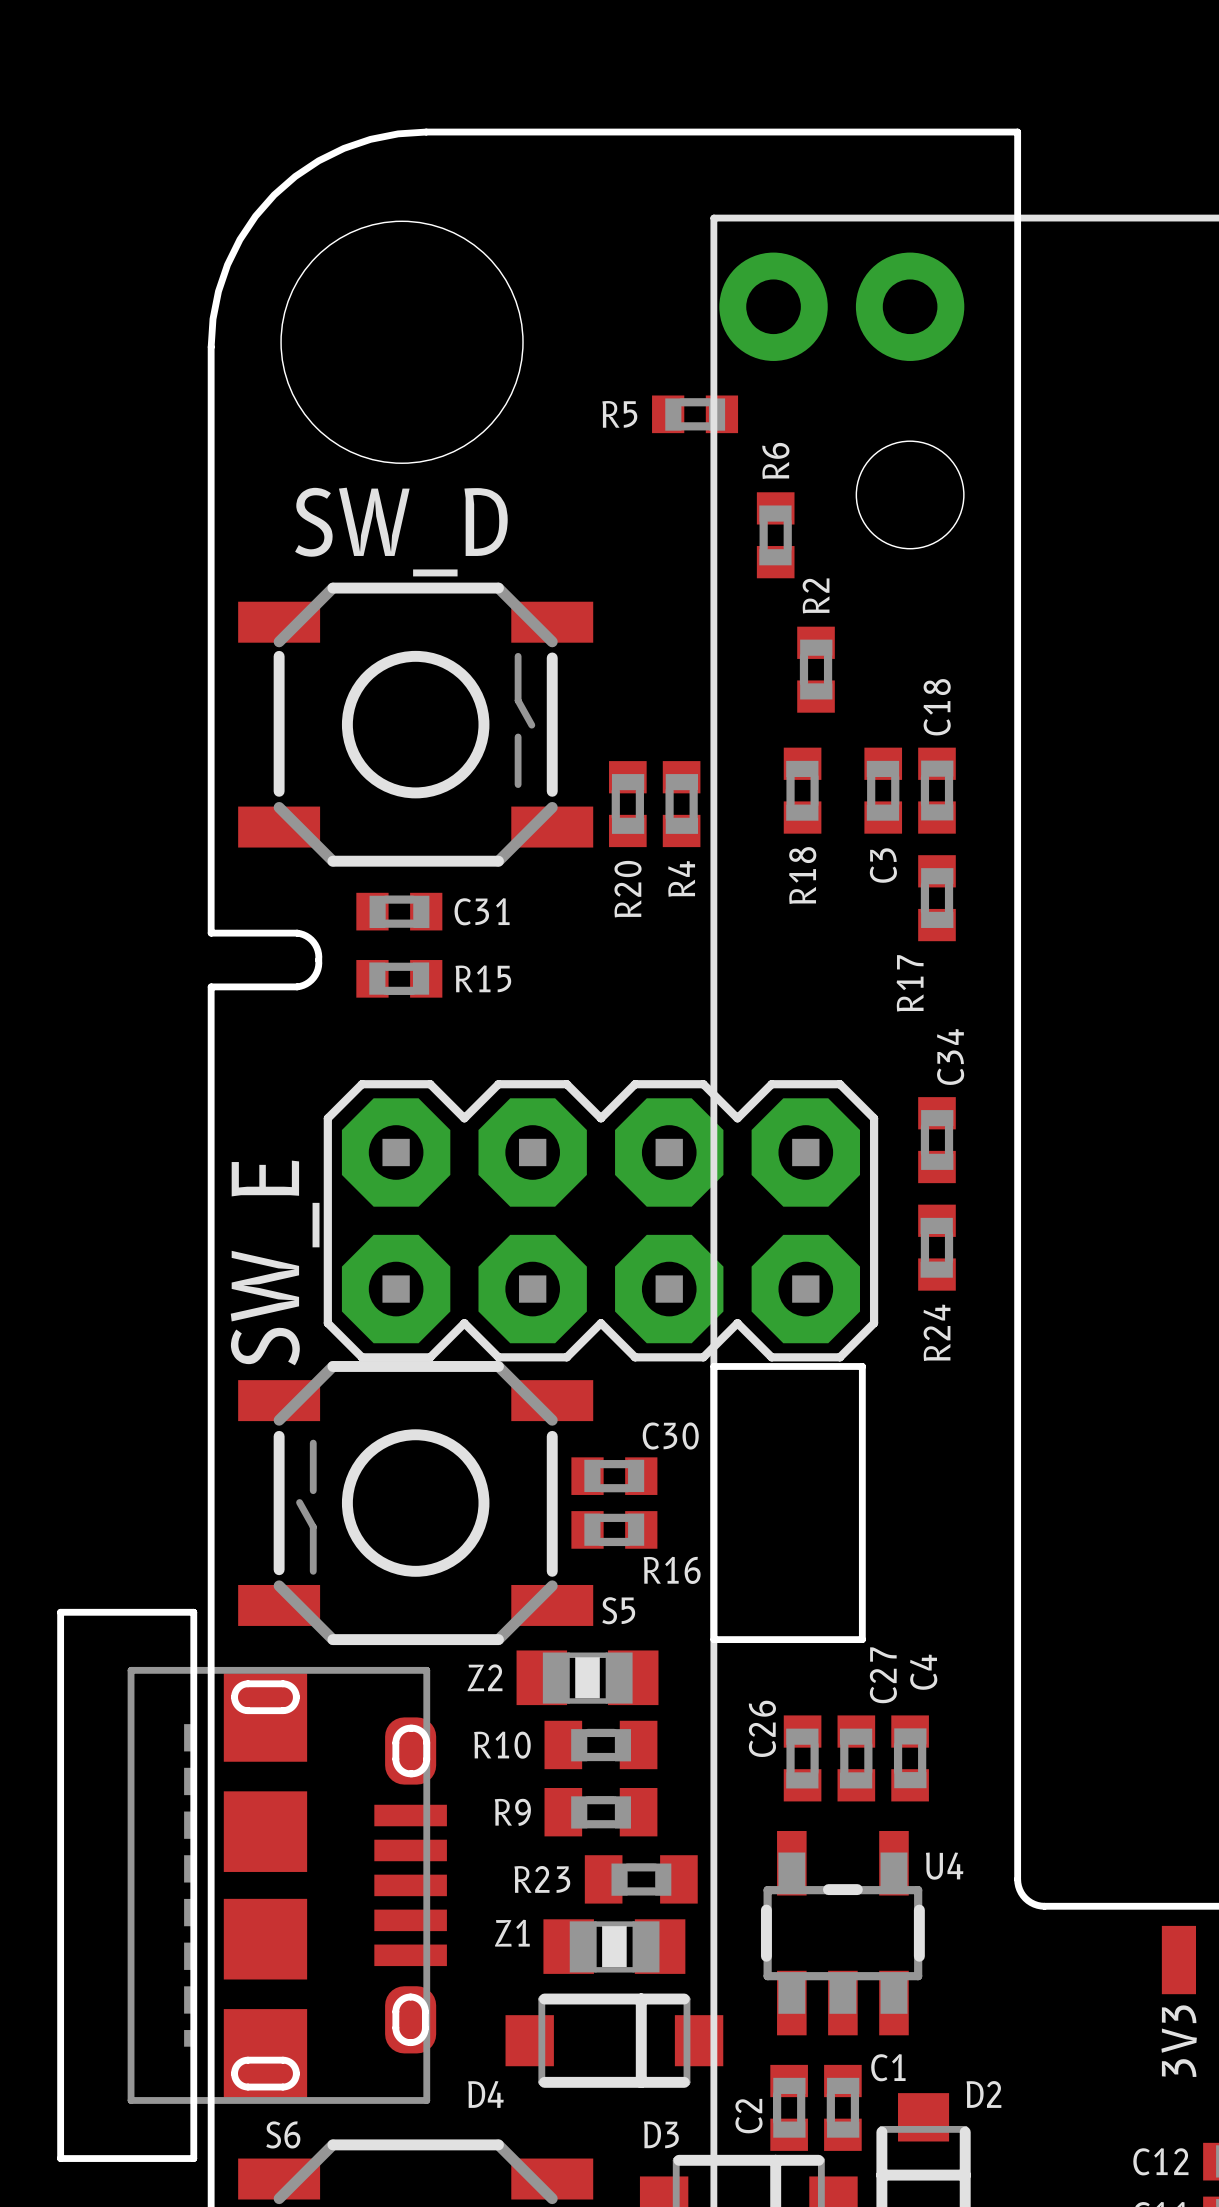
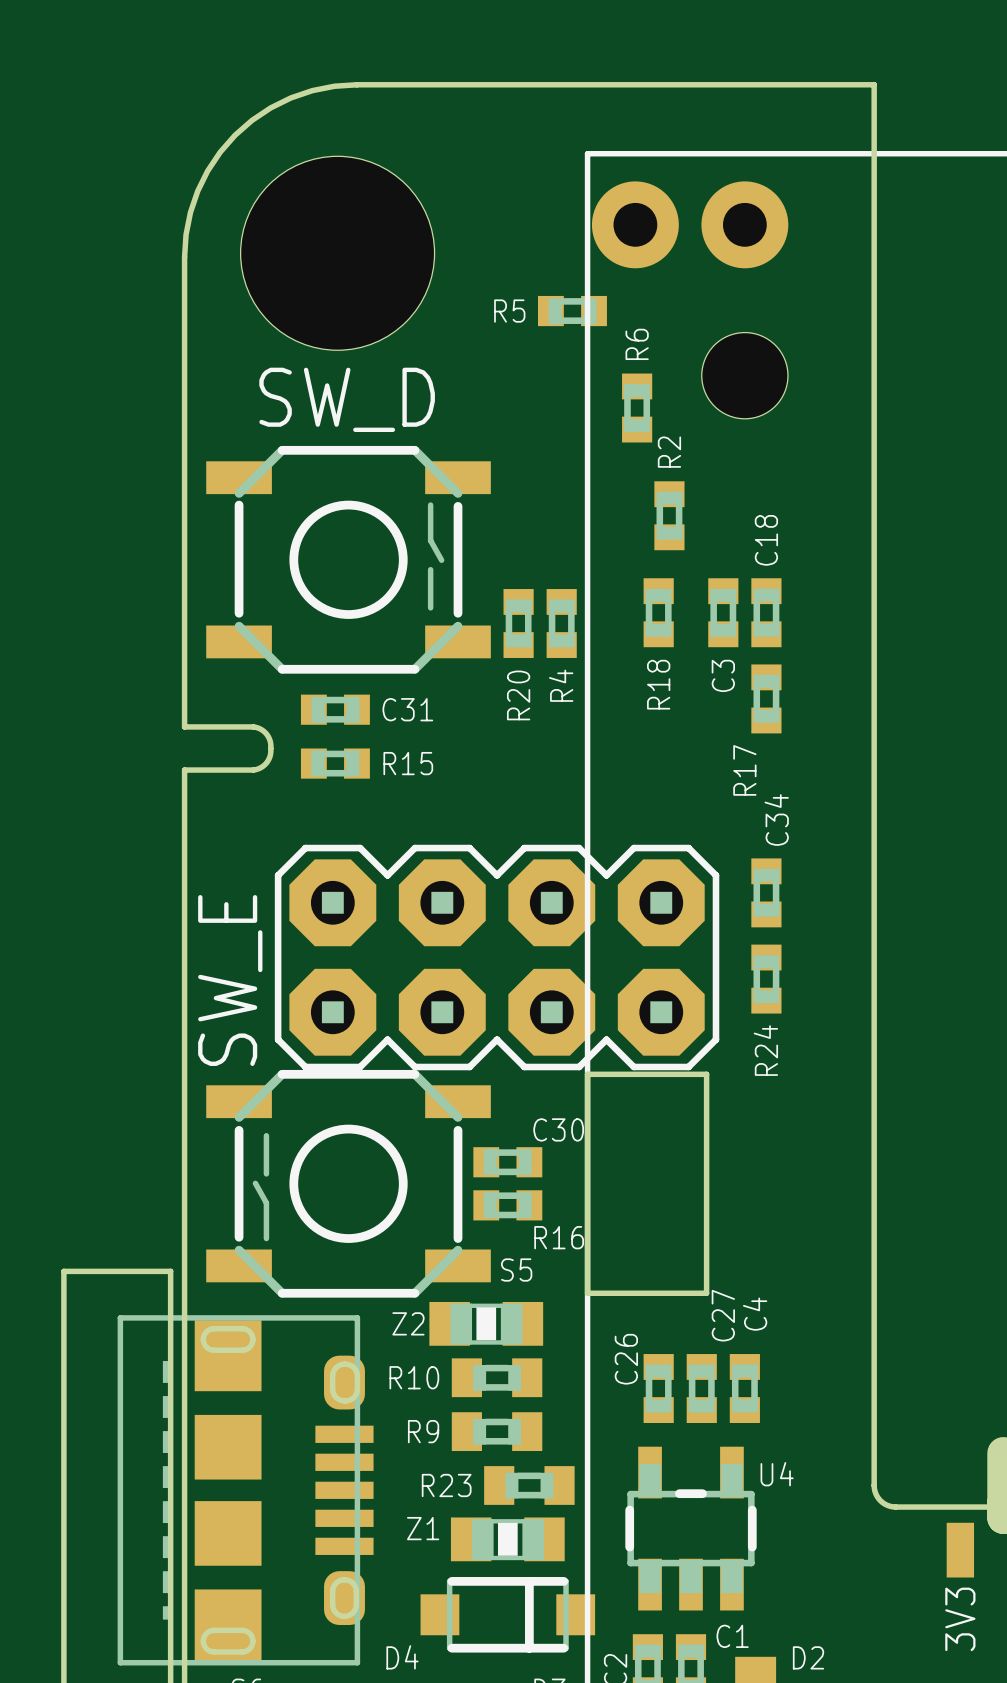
board edge: (1017, 132) (1017, 1879) (1023, 1895) (1037, 1905) (1098, 1906) -> (831, 84) (874, 84) (874, 1485) (875, 1493) (880, 1500) (887, 1505) (895, 1507)

